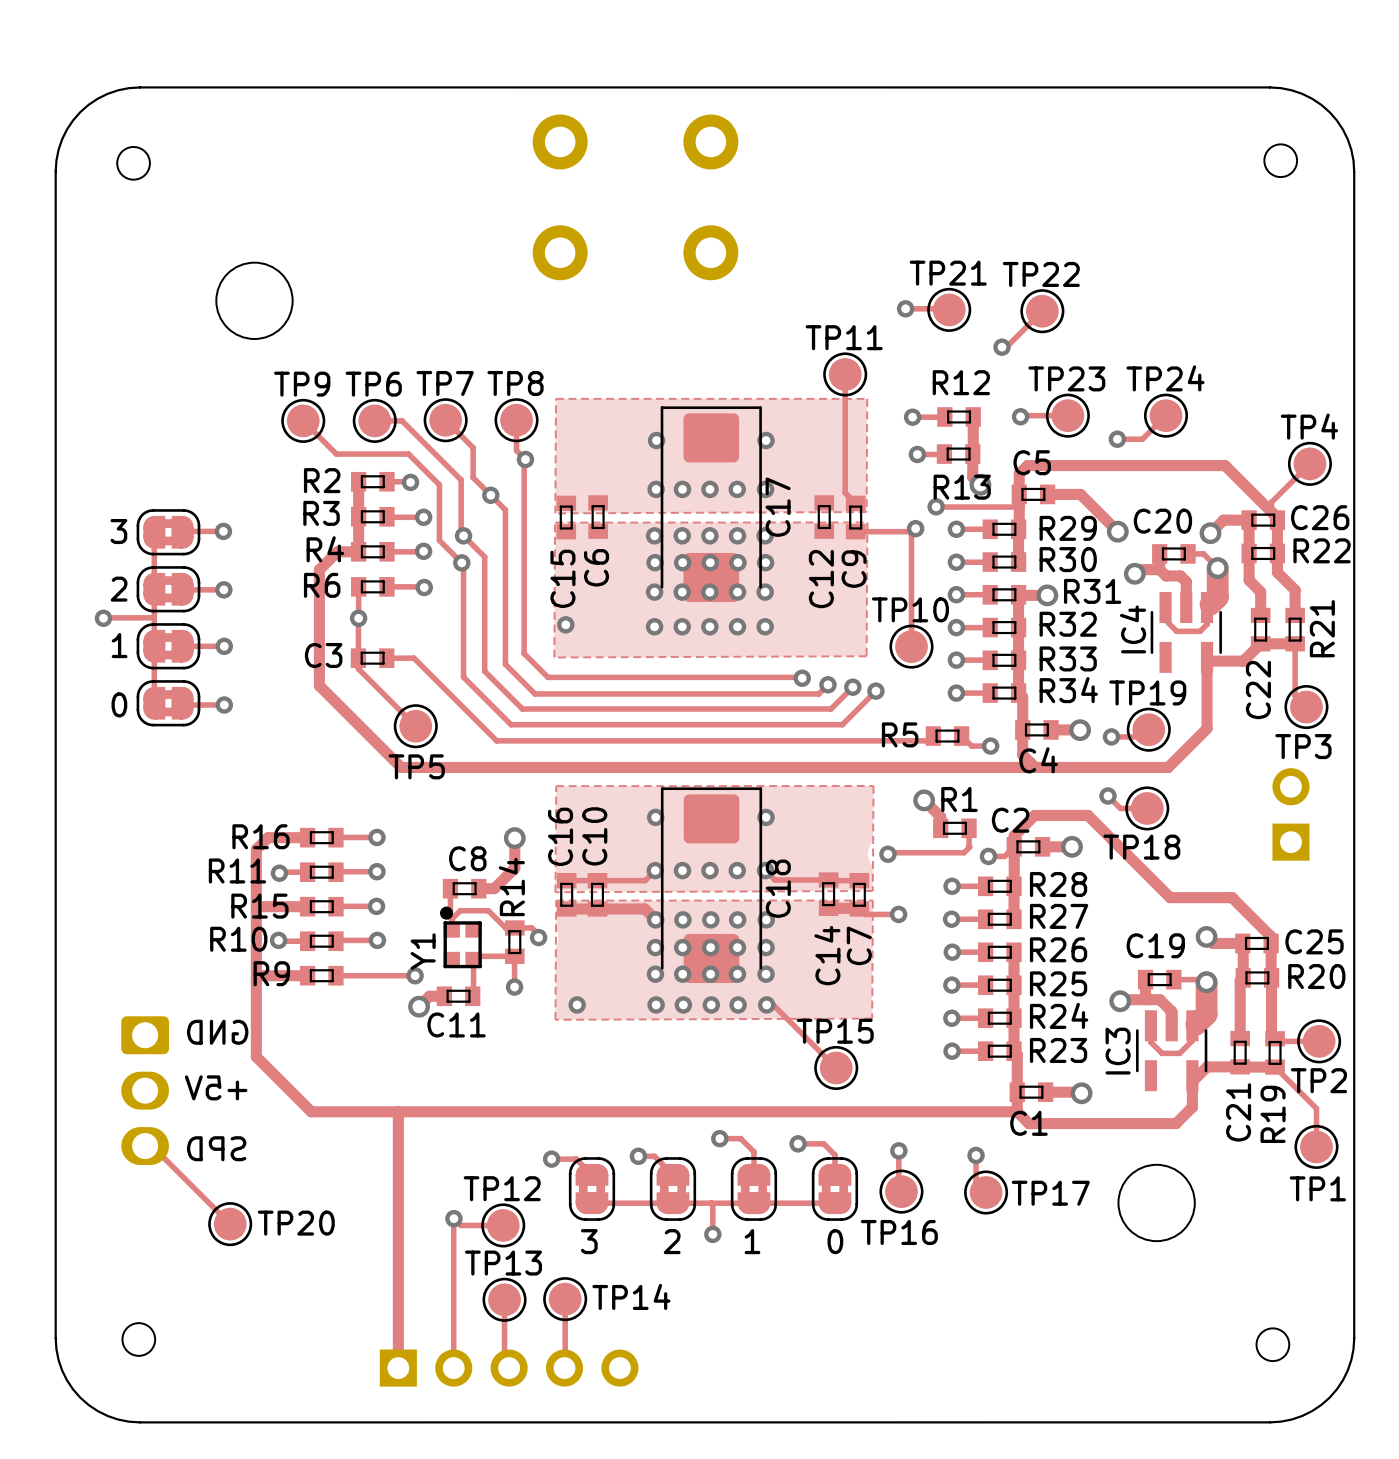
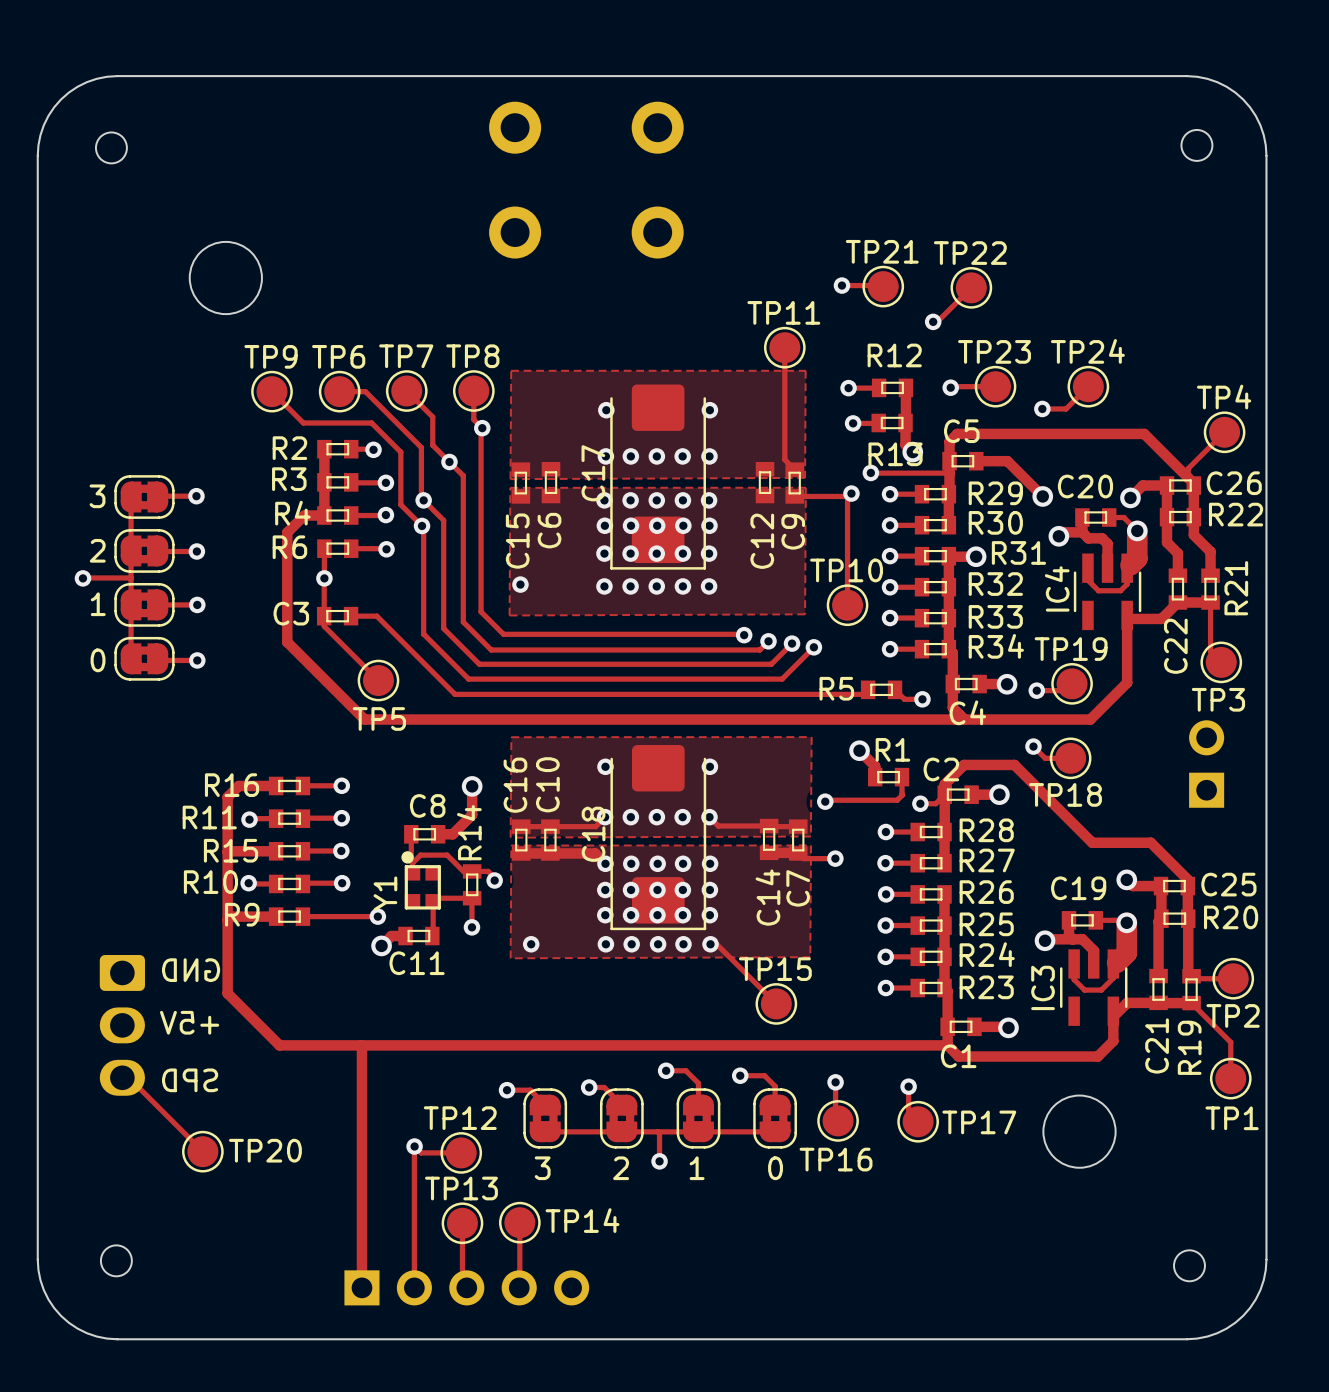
C17 rotation: 0° (711, 504) -> 180° (658, 477)
C18 rotation: 0° (711, 885) -> 180° (658, 837)

